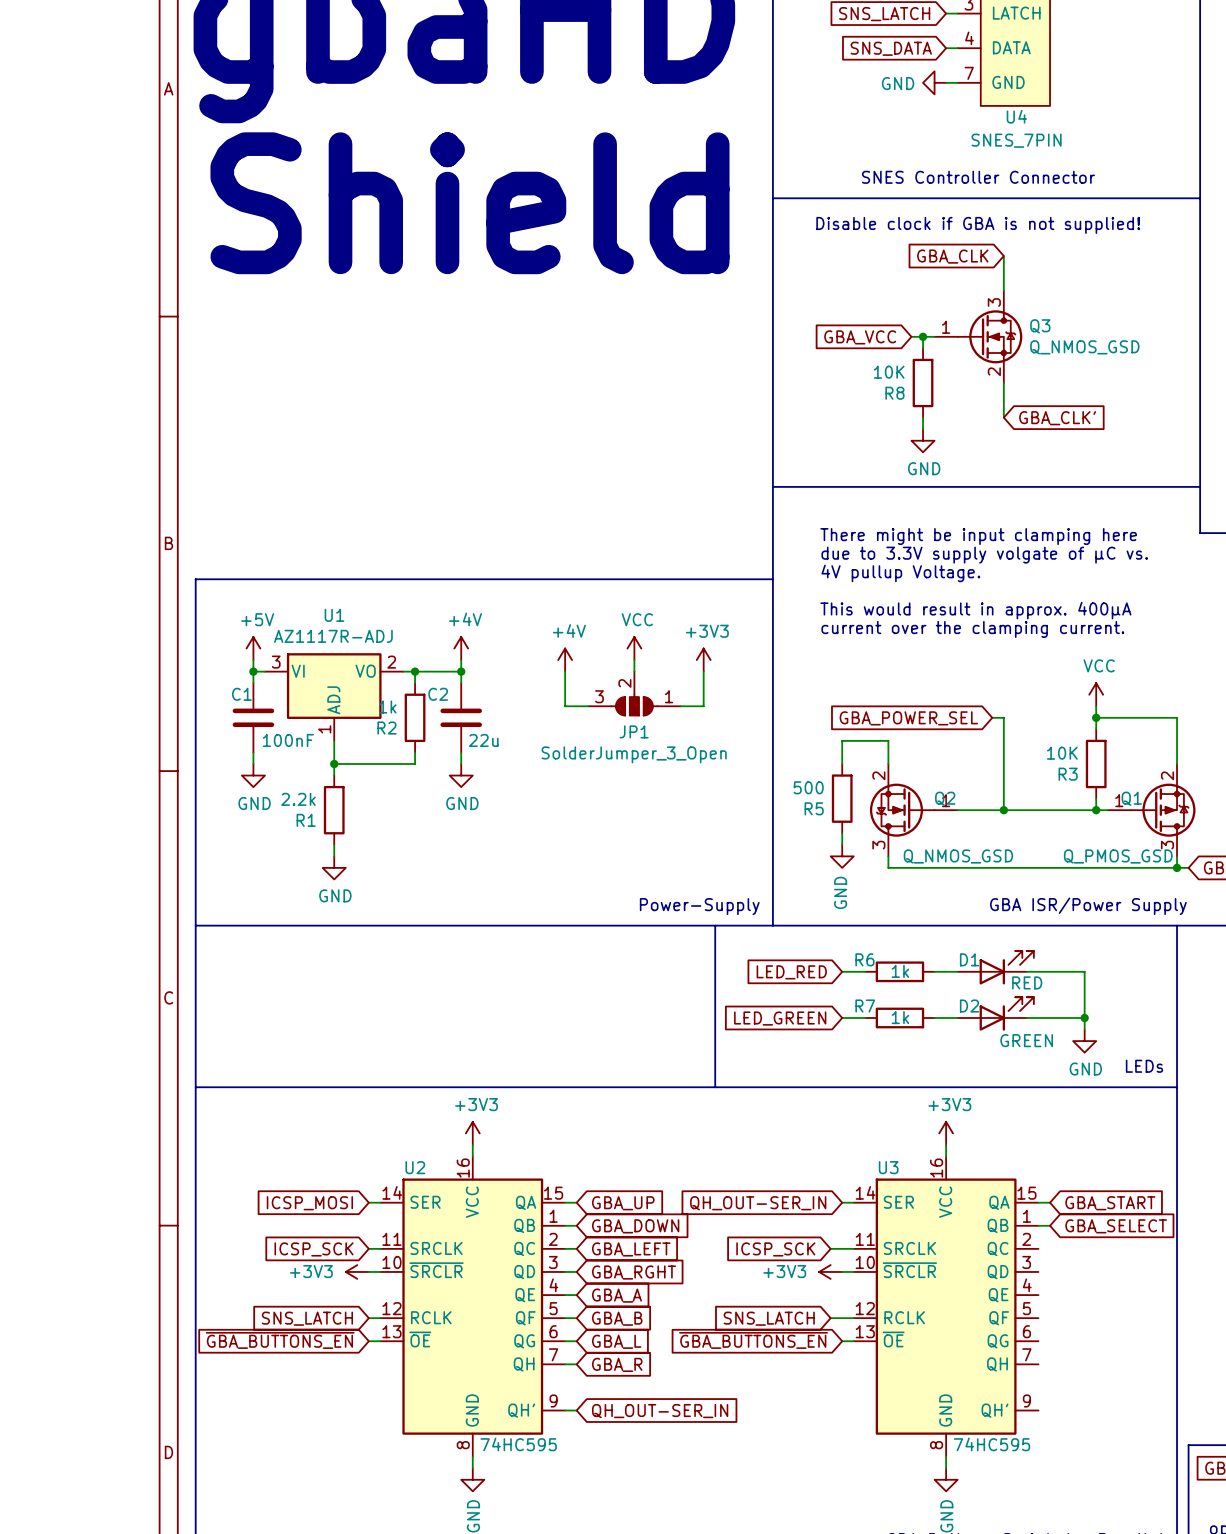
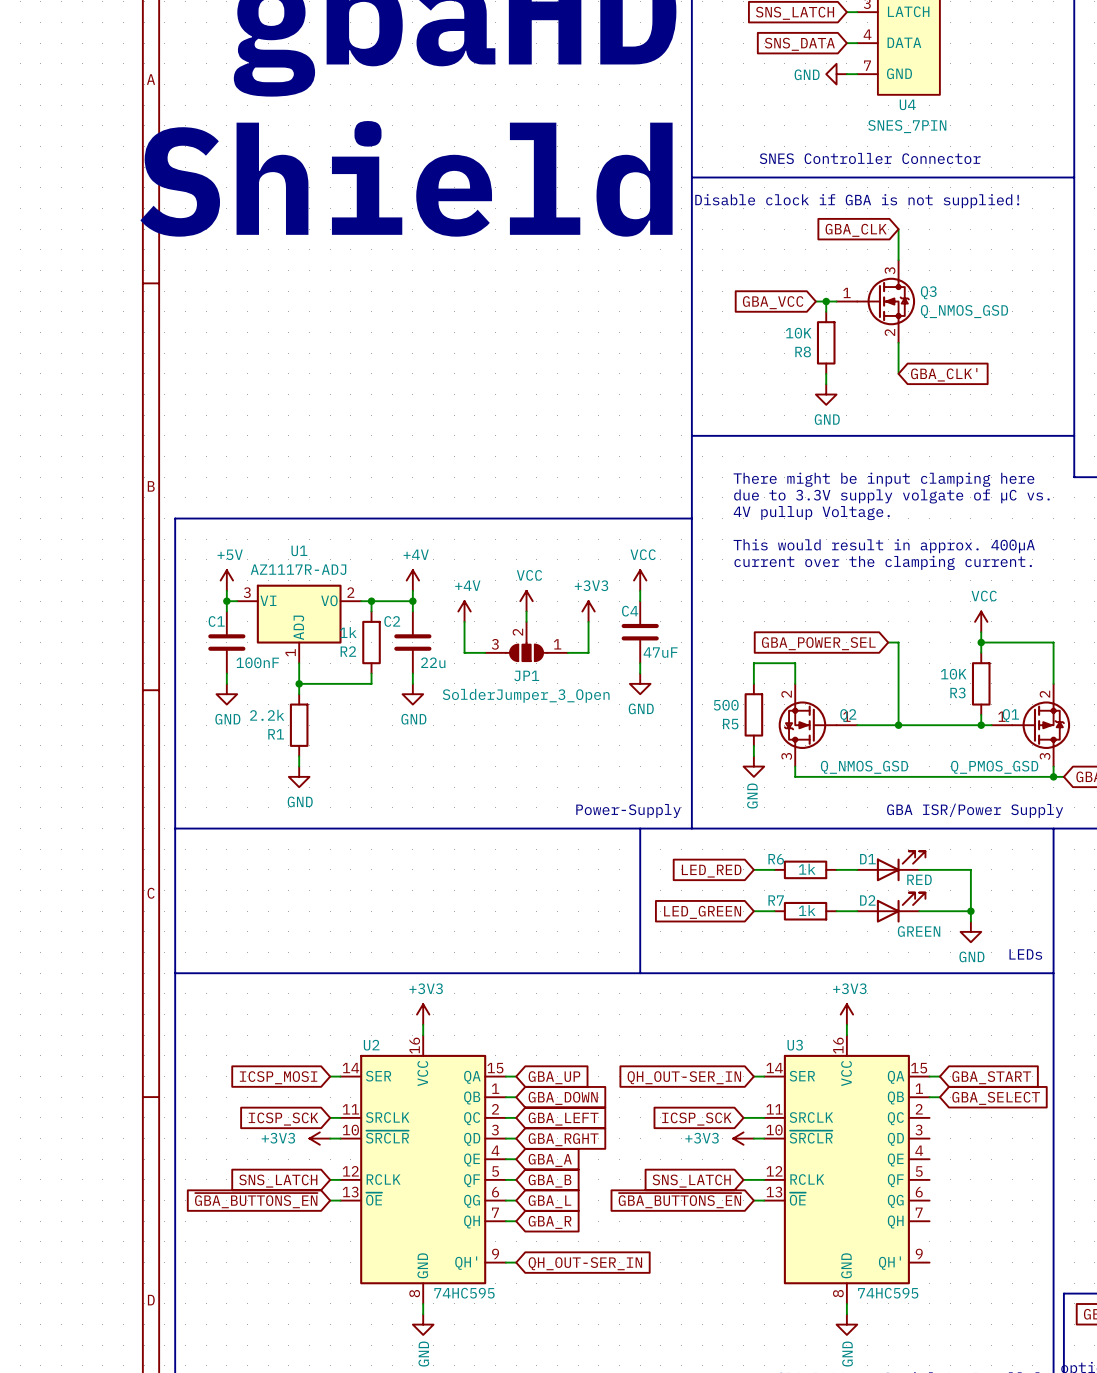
power symbol: VCC (634, 648) -> none
power symbol: none -> VCC (640, 580)
power symbol position: +4V (565, 660) -> +4V (464, 611)
wire: (634, 660) (634, 671) -> (526, 611) (526, 621)
power symbol position: +3V3 (703, 660) -> +3V3 (588, 611)
wire: none -> (640, 590) (640, 601)
wire: (565, 671) (565, 706) (588, 706) -> (464, 621) (464, 652) (485, 652)
power symbol: none -> VCC (526, 601)
wire: (703, 671) (703, 706) (680, 706) -> (588, 621) (588, 652) (567, 652)
JP1 position: (634, 693) -> (526, 641)
C4: none -> 47uF (640, 632)
wire: none -> (640, 663) (640, 673)
power symbol: none -> GND (640, 683)

